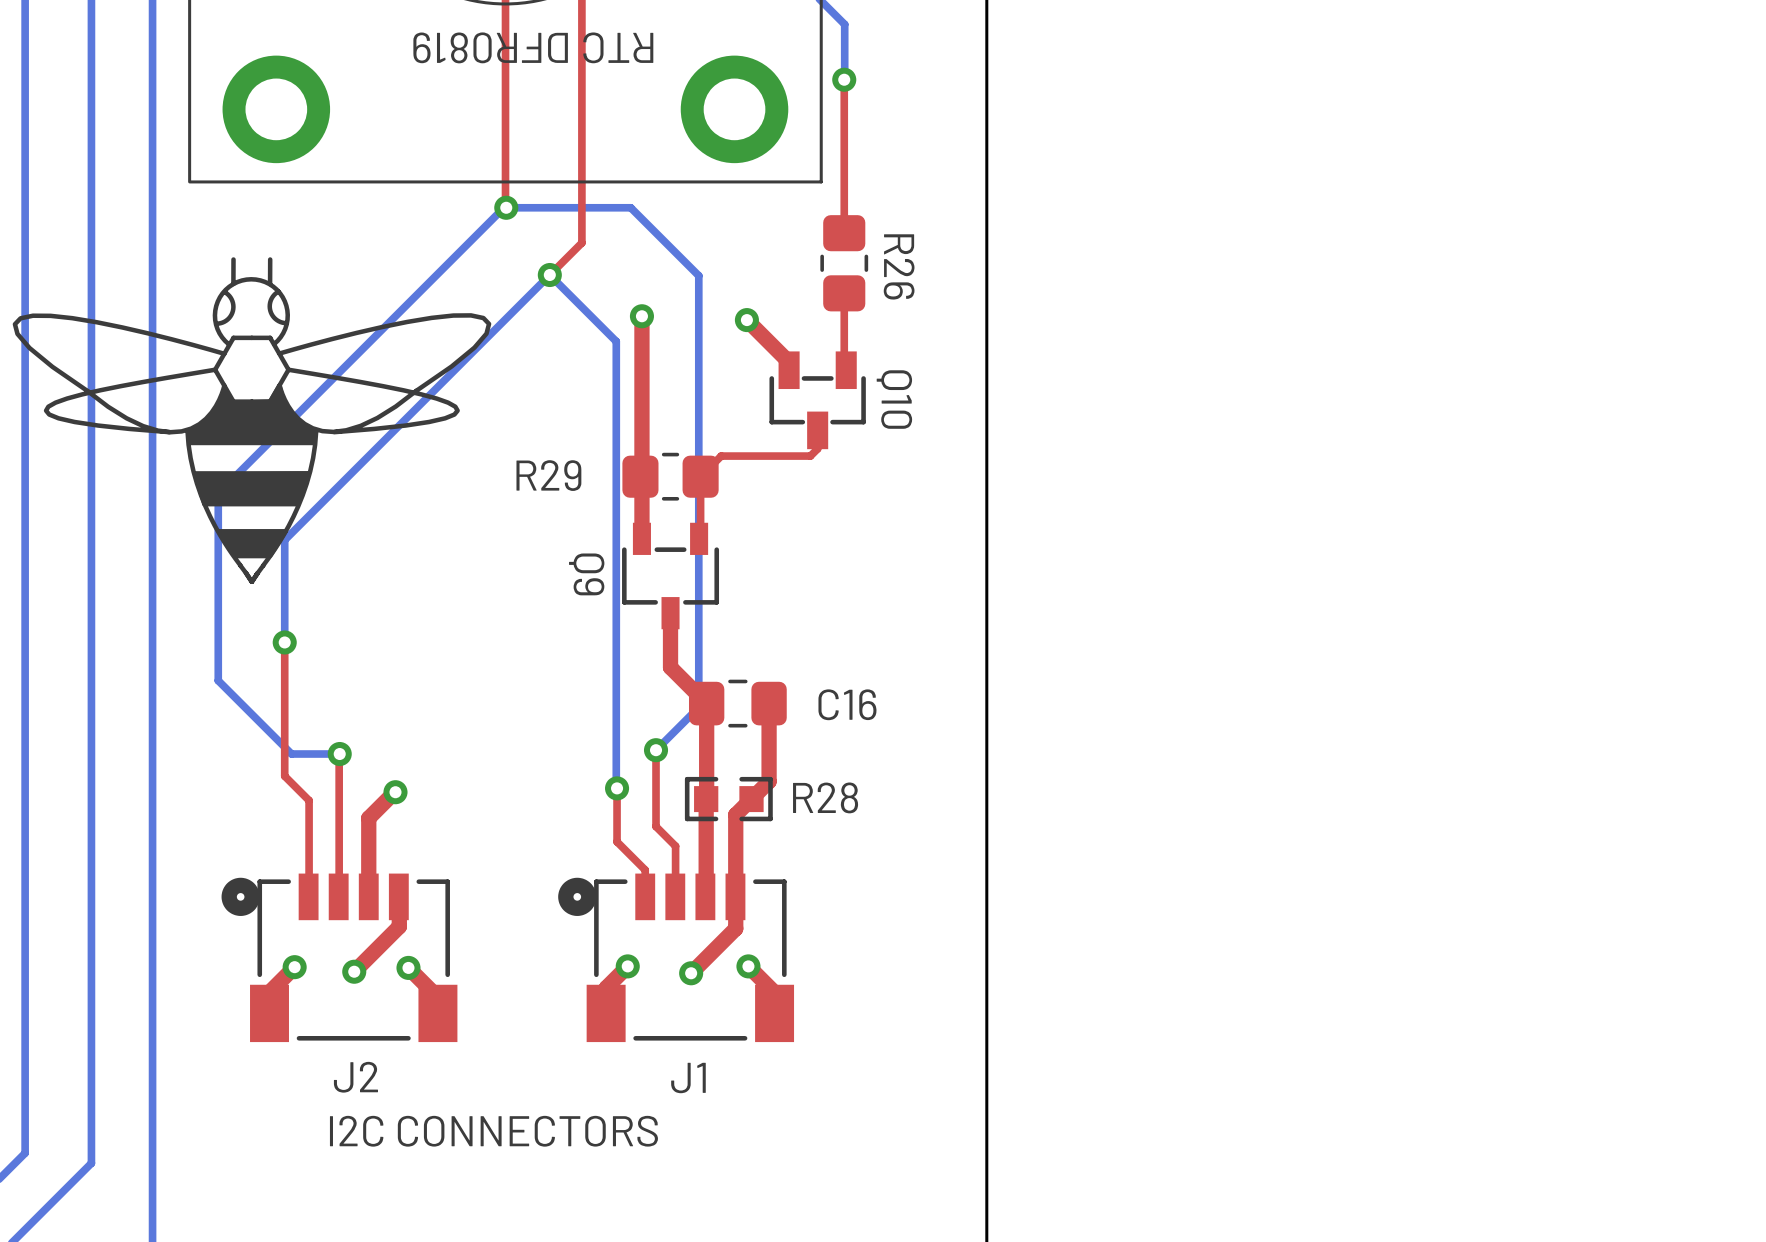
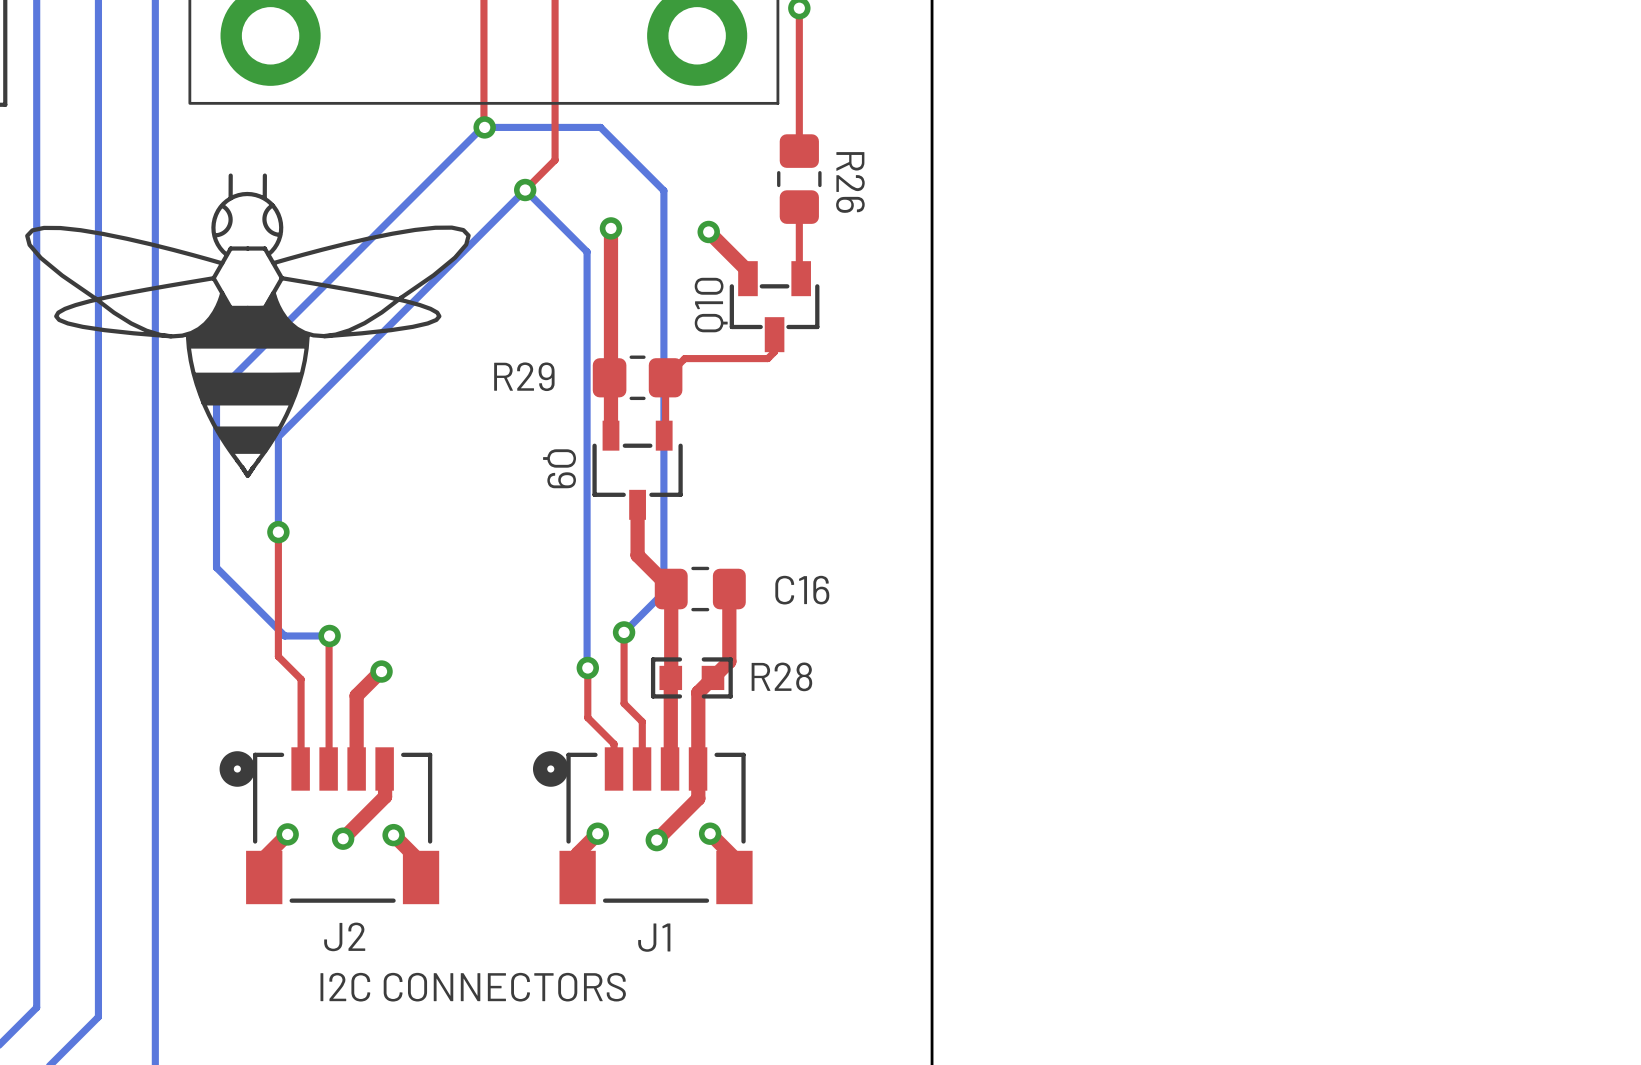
Q10 name rotation: 0° (894, 399) -> 180° (711, 305)
Q10 name position: Q10 (894, 399) -> Q10 (711, 305)

